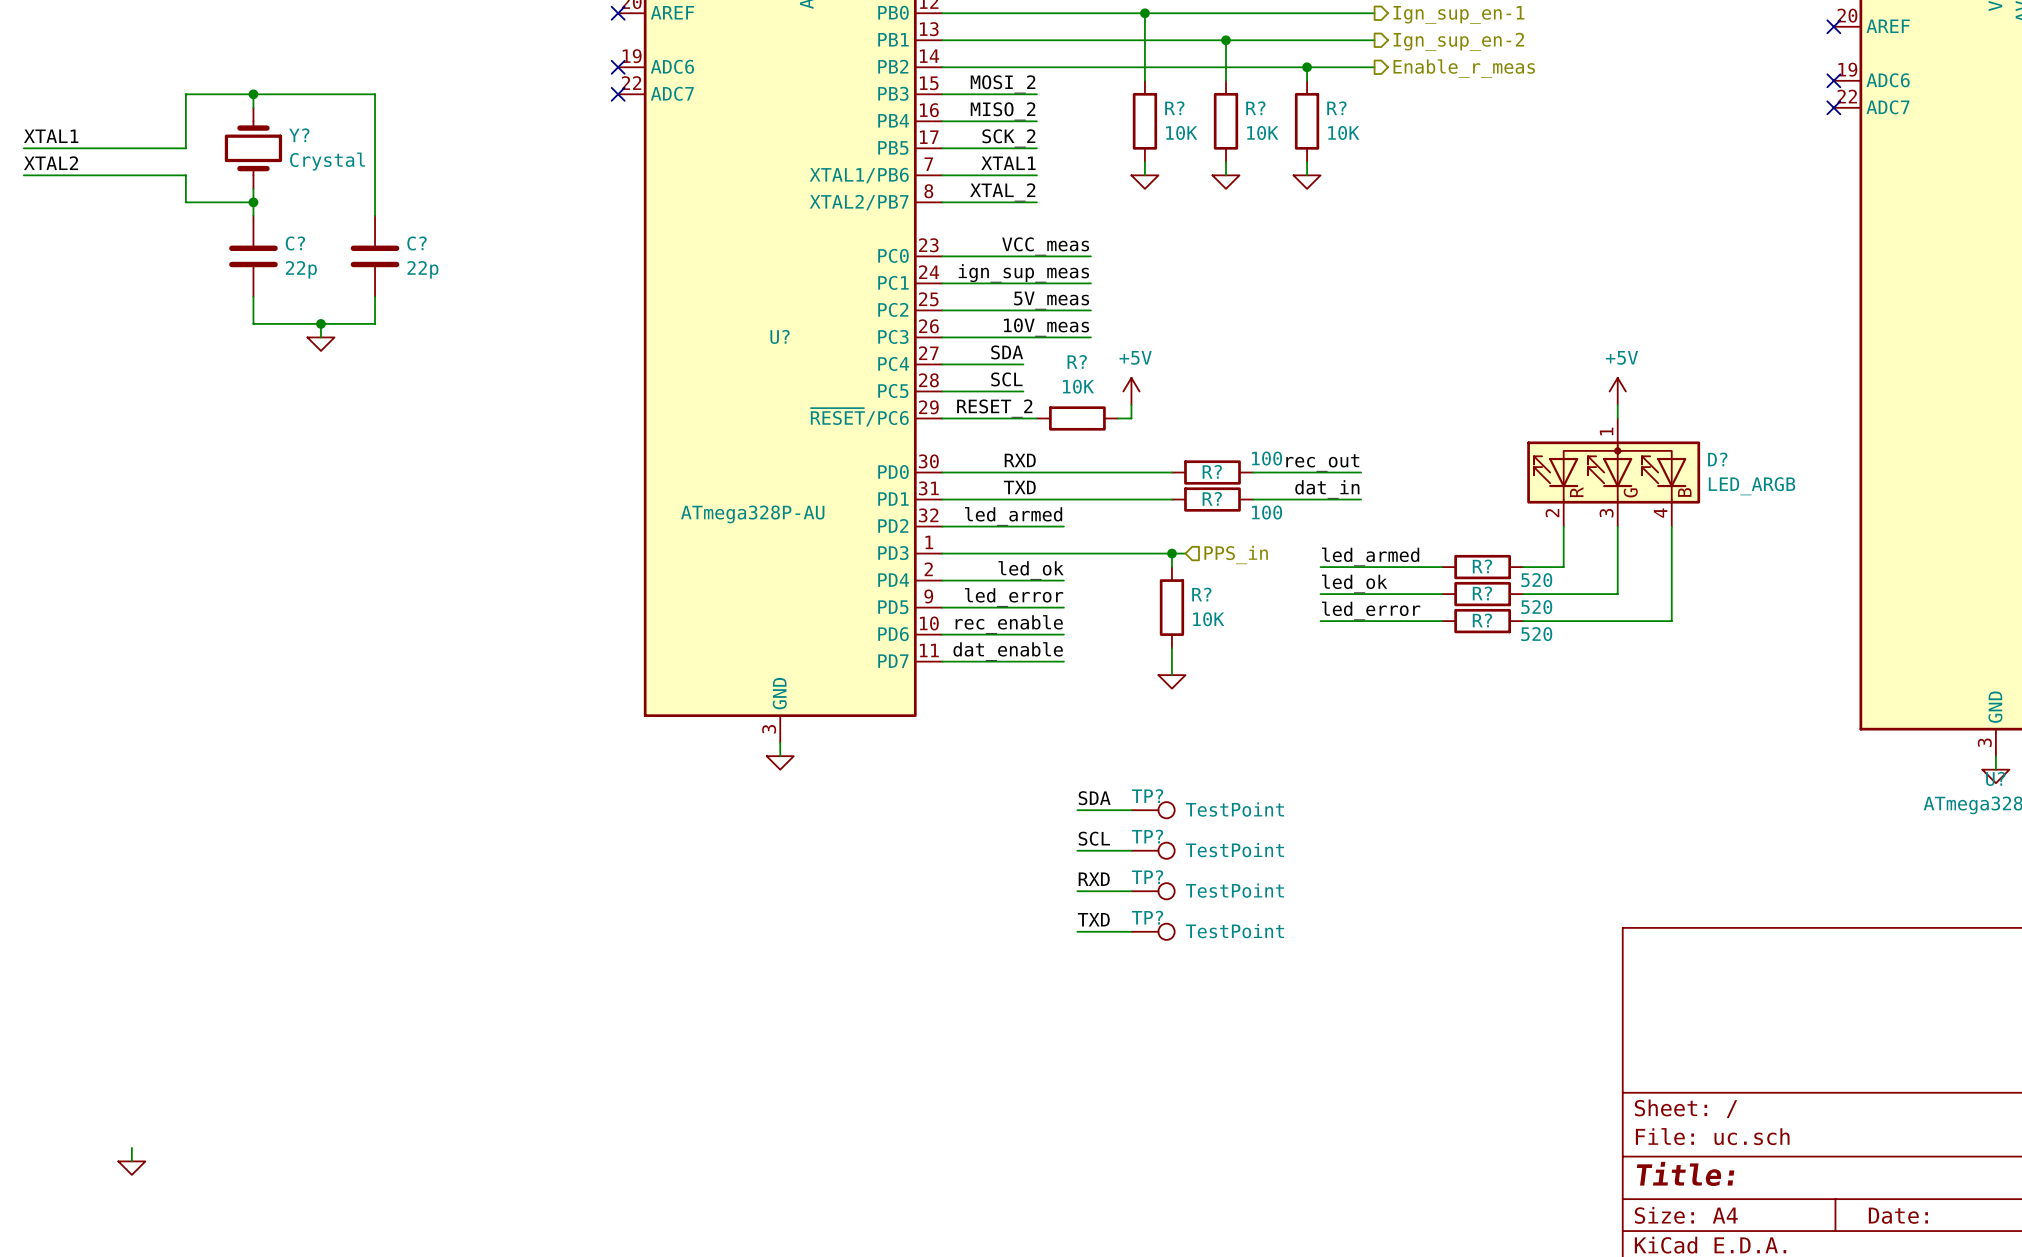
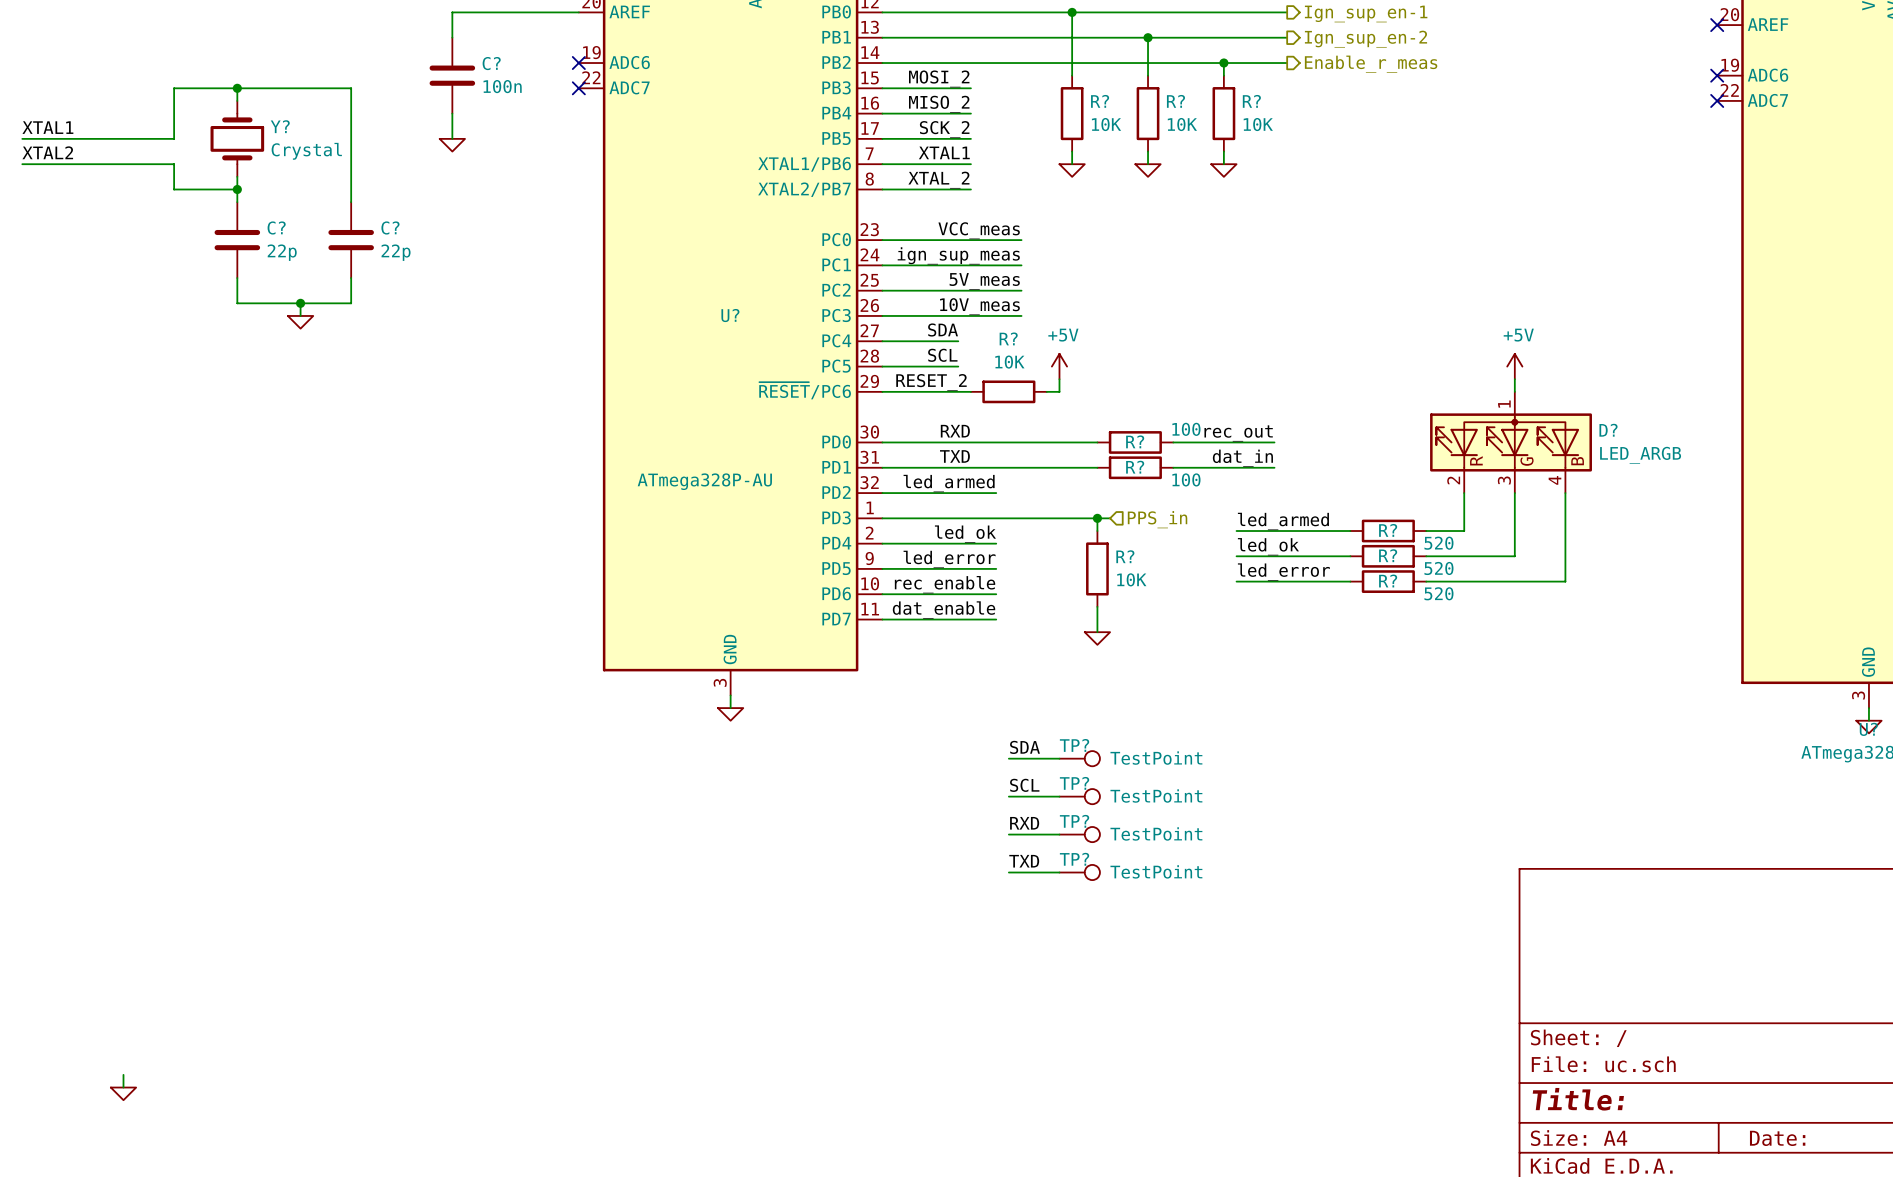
wire: none -> (578, 12) (452, 12) (452, 37)
no-connect mark: (618, 13) -> none
C?: none -> 100n (452, 75)
wire: none -> (452, 113) (452, 138)
power symbol: none -> (452, 145)

